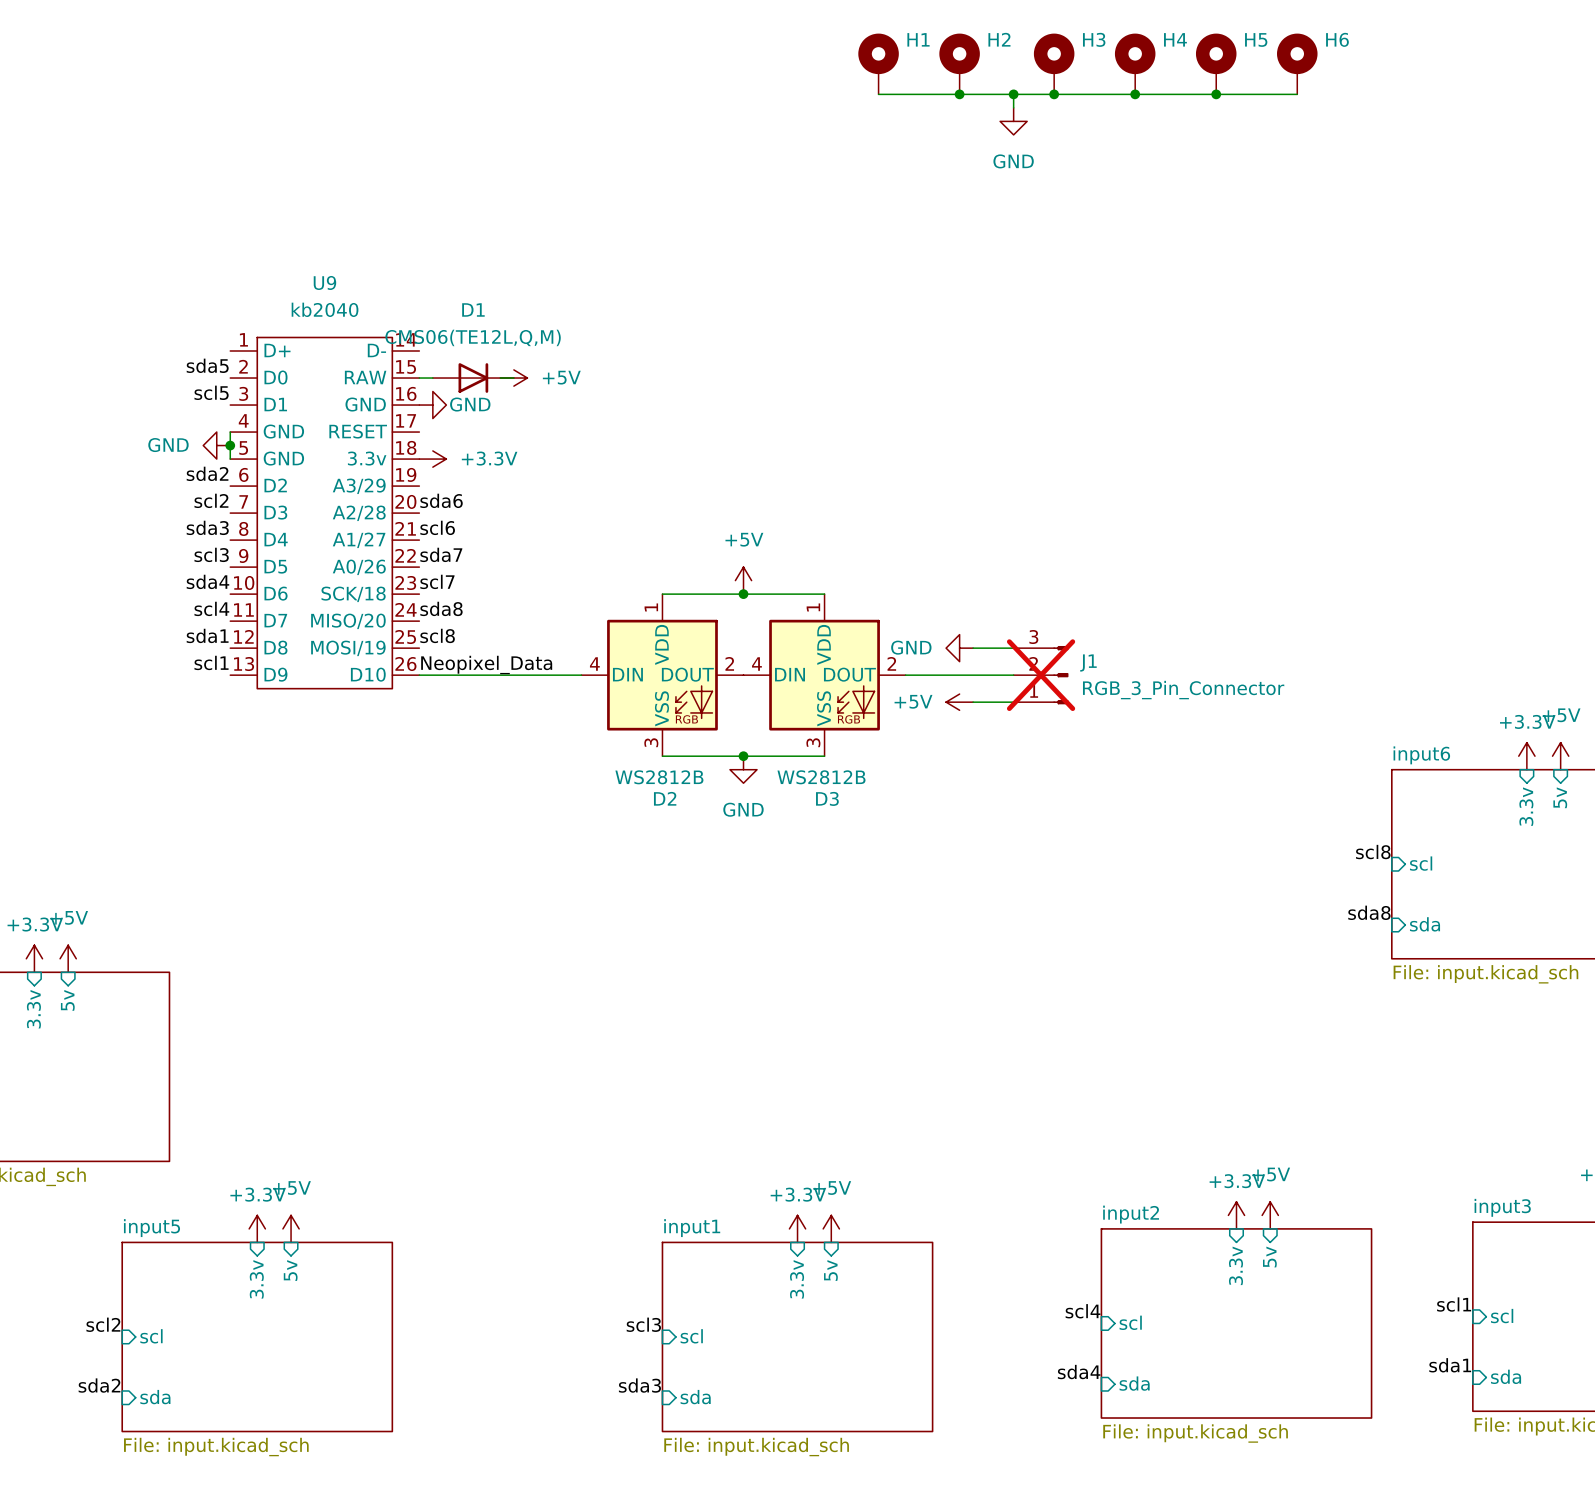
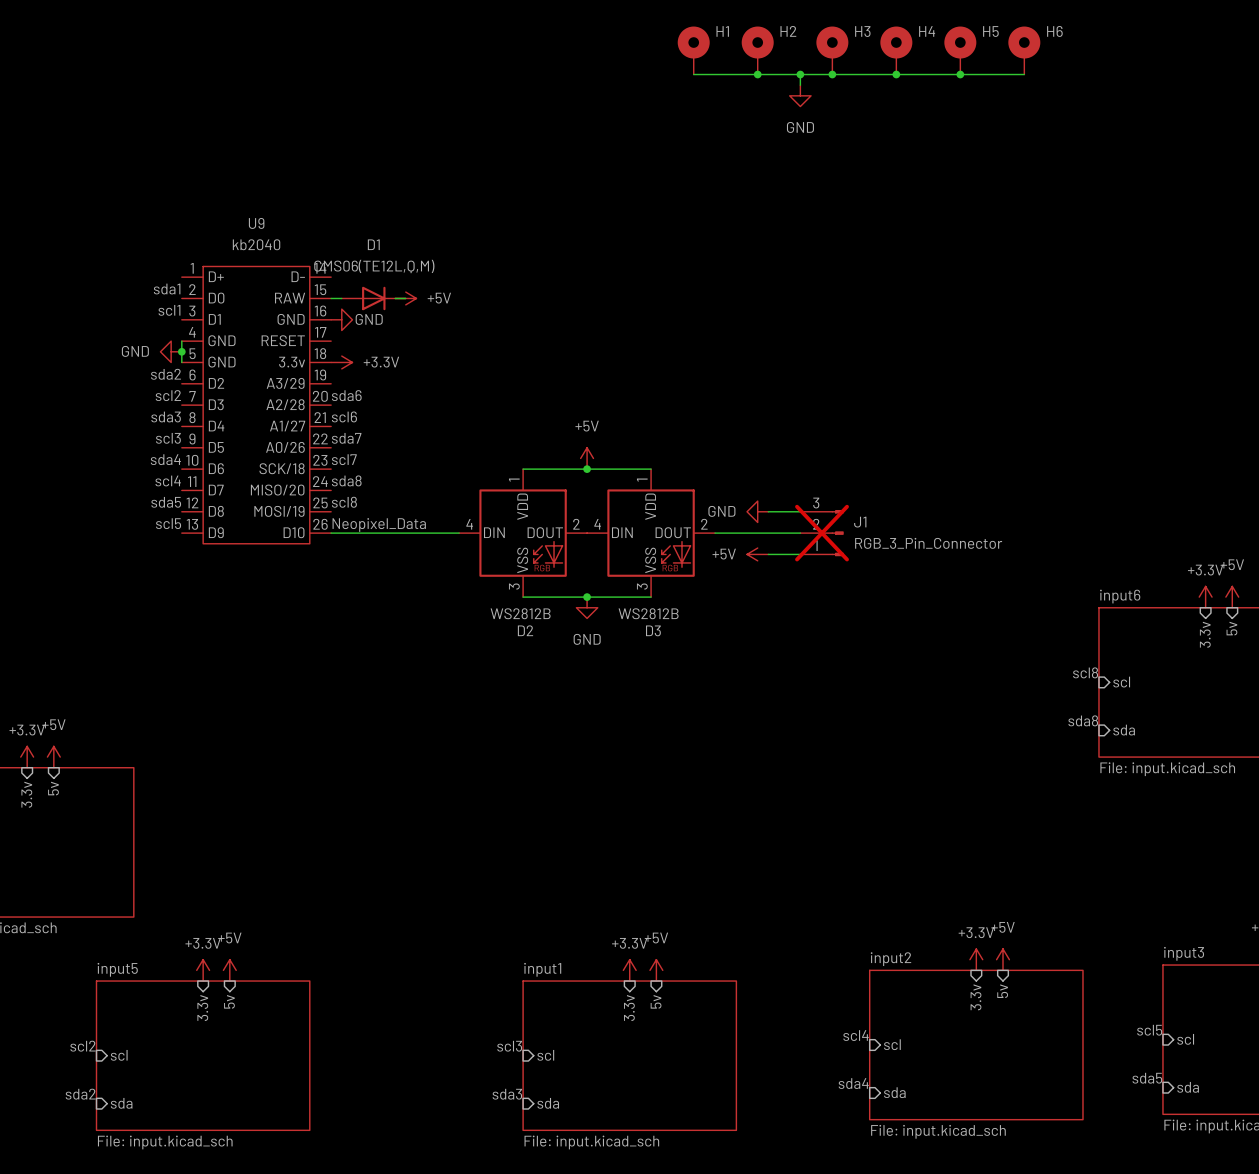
label: sda5 (207, 365) -> sda1 (167, 289)
label: scl5 (211, 392) -> scl1 (169, 310)
label: sda1 (207, 635) -> sda5 (166, 502)
label: scl1 (211, 662) -> scl5 (168, 523)
label: scl1 (1454, 1304) -> scl5 (1149, 1030)
label: sda1 (1450, 1365) -> sda5 (1147, 1078)

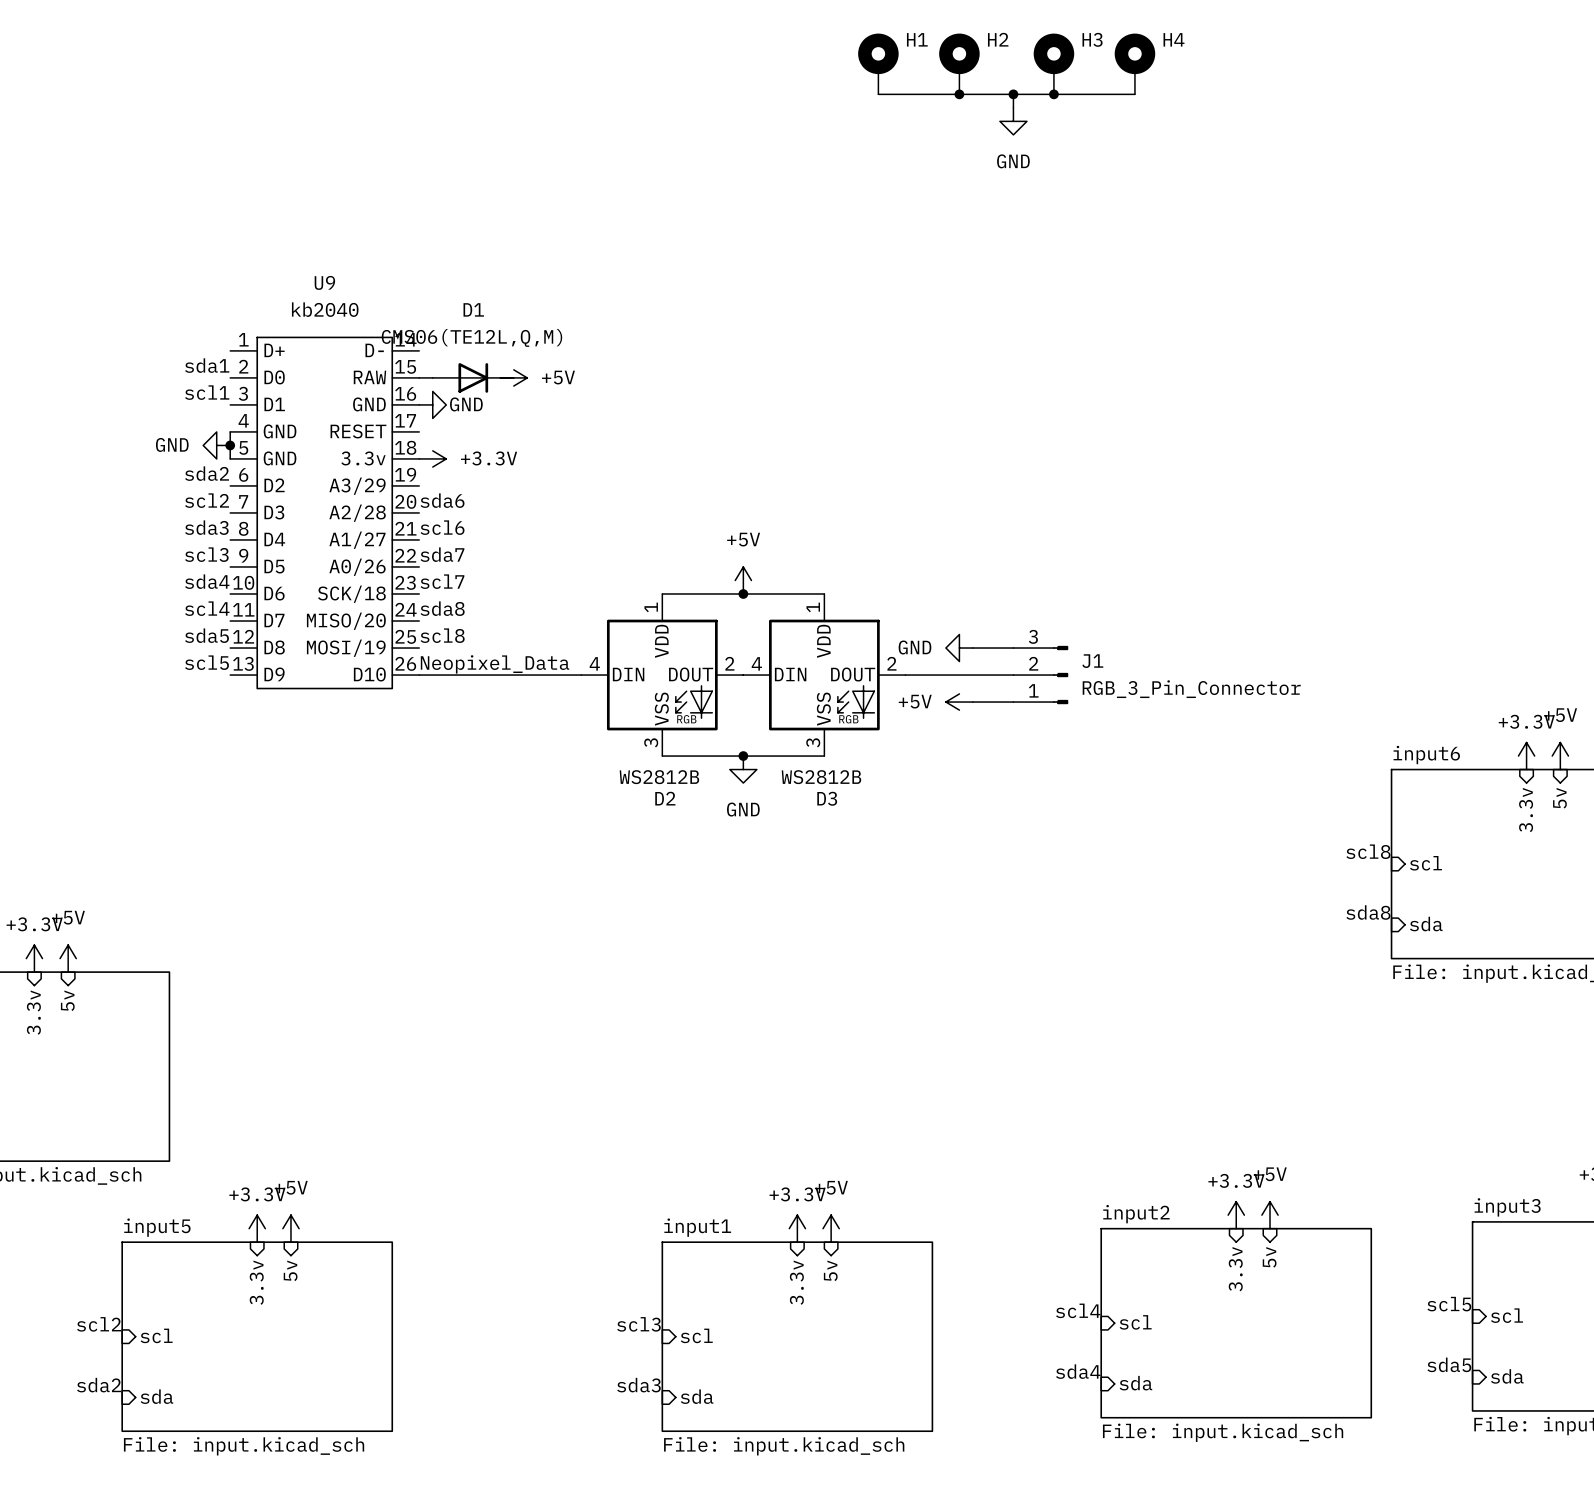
H5: (960, 50) -> none
H6: (1024, 50) -> none
wire: (896, 74) (1024, 74) -> none
junction: (896, 74) -> none
junction: (960, 74) -> none
J1 do-not-place cross: (822, 533) -> none

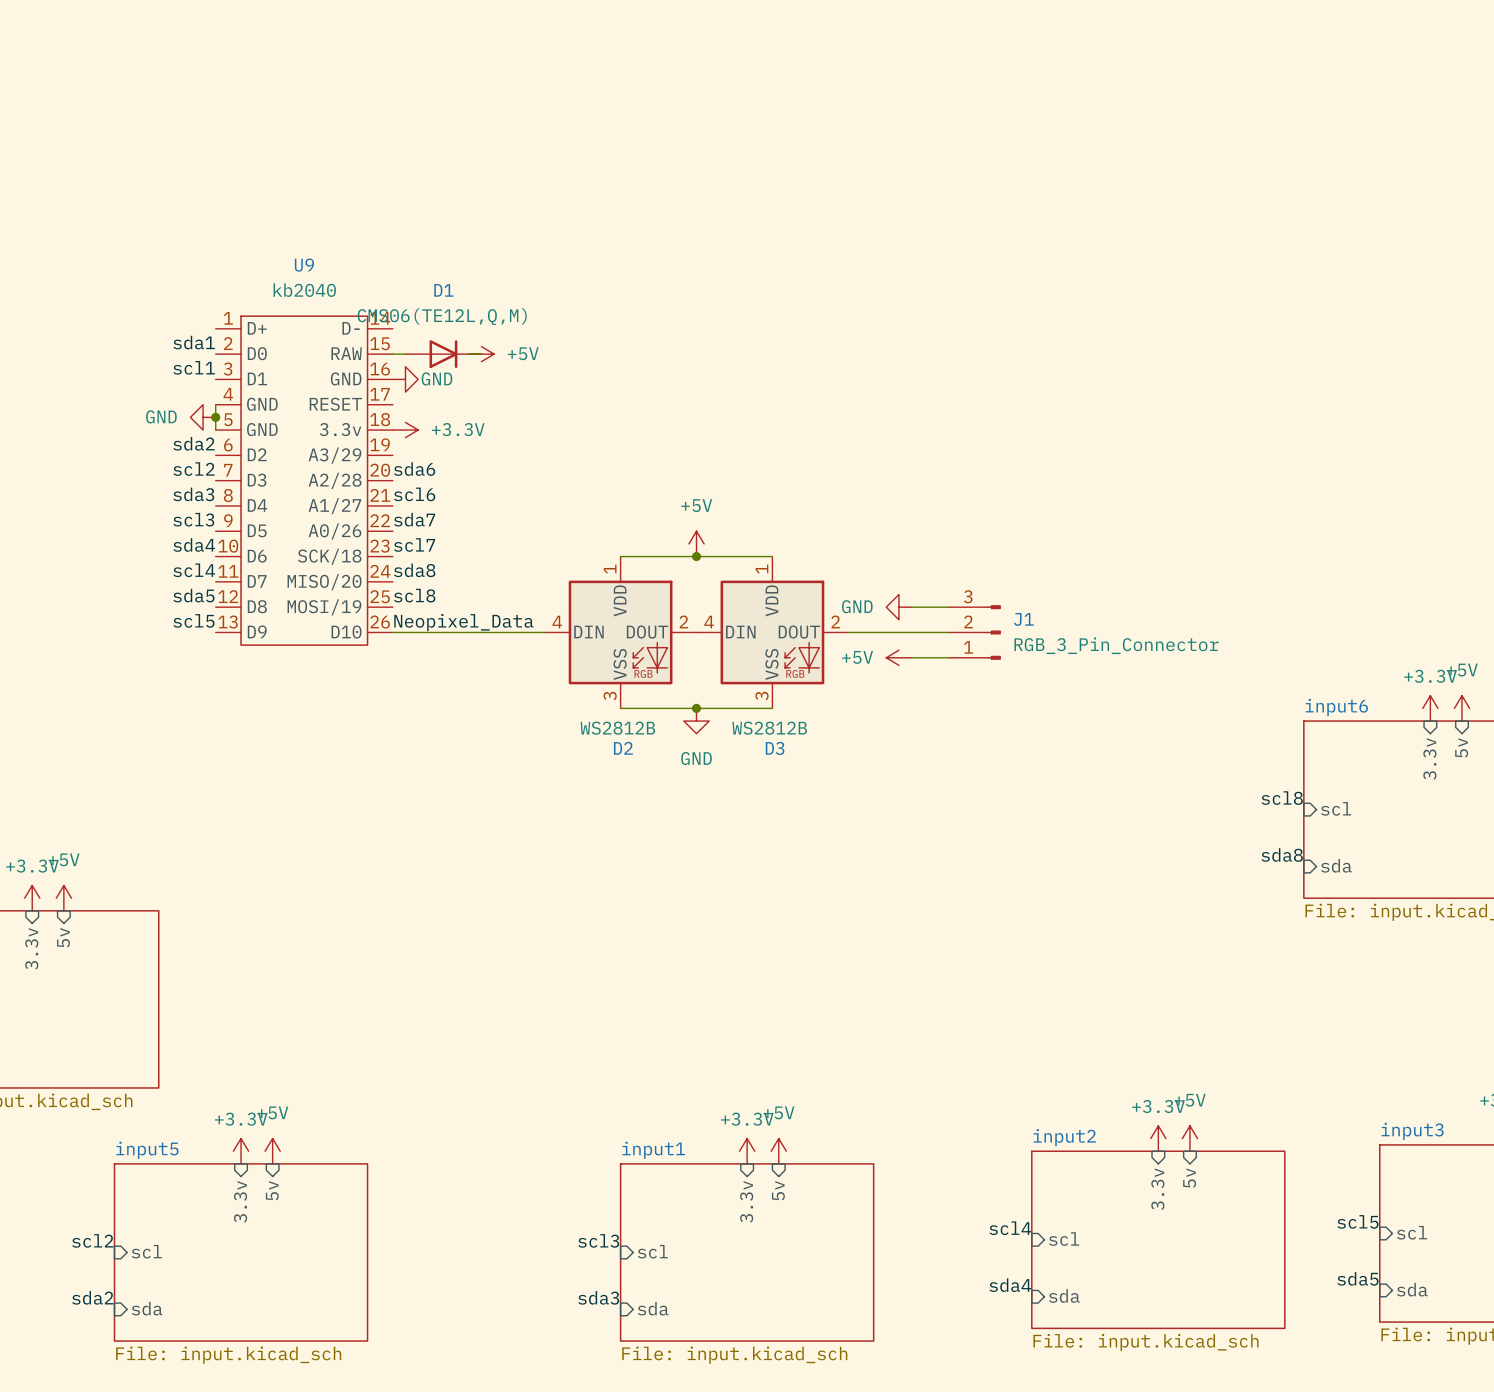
H1: (878, 63) -> none
H2: (959, 63) -> none
H3: (1053, 63) -> none
H4: (1134, 63) -> none
wire: (878, 94) (1134, 94) -> none
junction: (959, 94) -> none
wire: (1013, 94) (1013, 107) -> none
junction: (1013, 94) -> none
junction: (1053, 94) -> none
power symbol: GND (1013, 121) -> none

